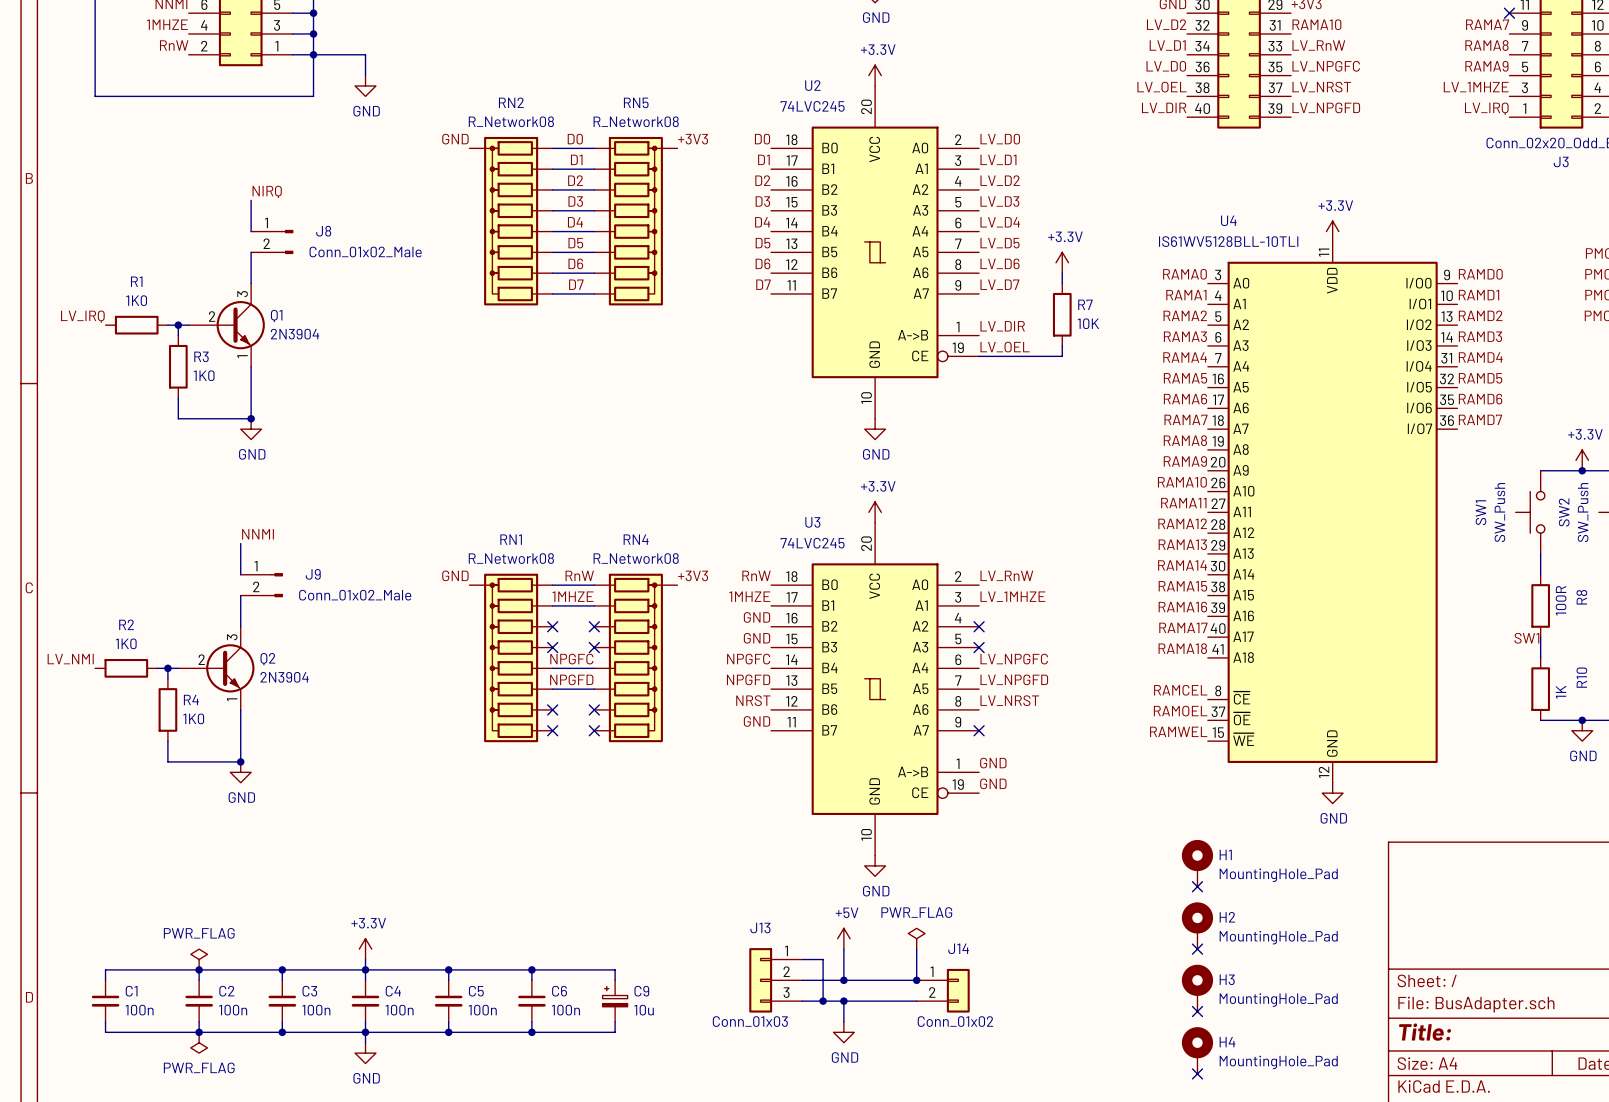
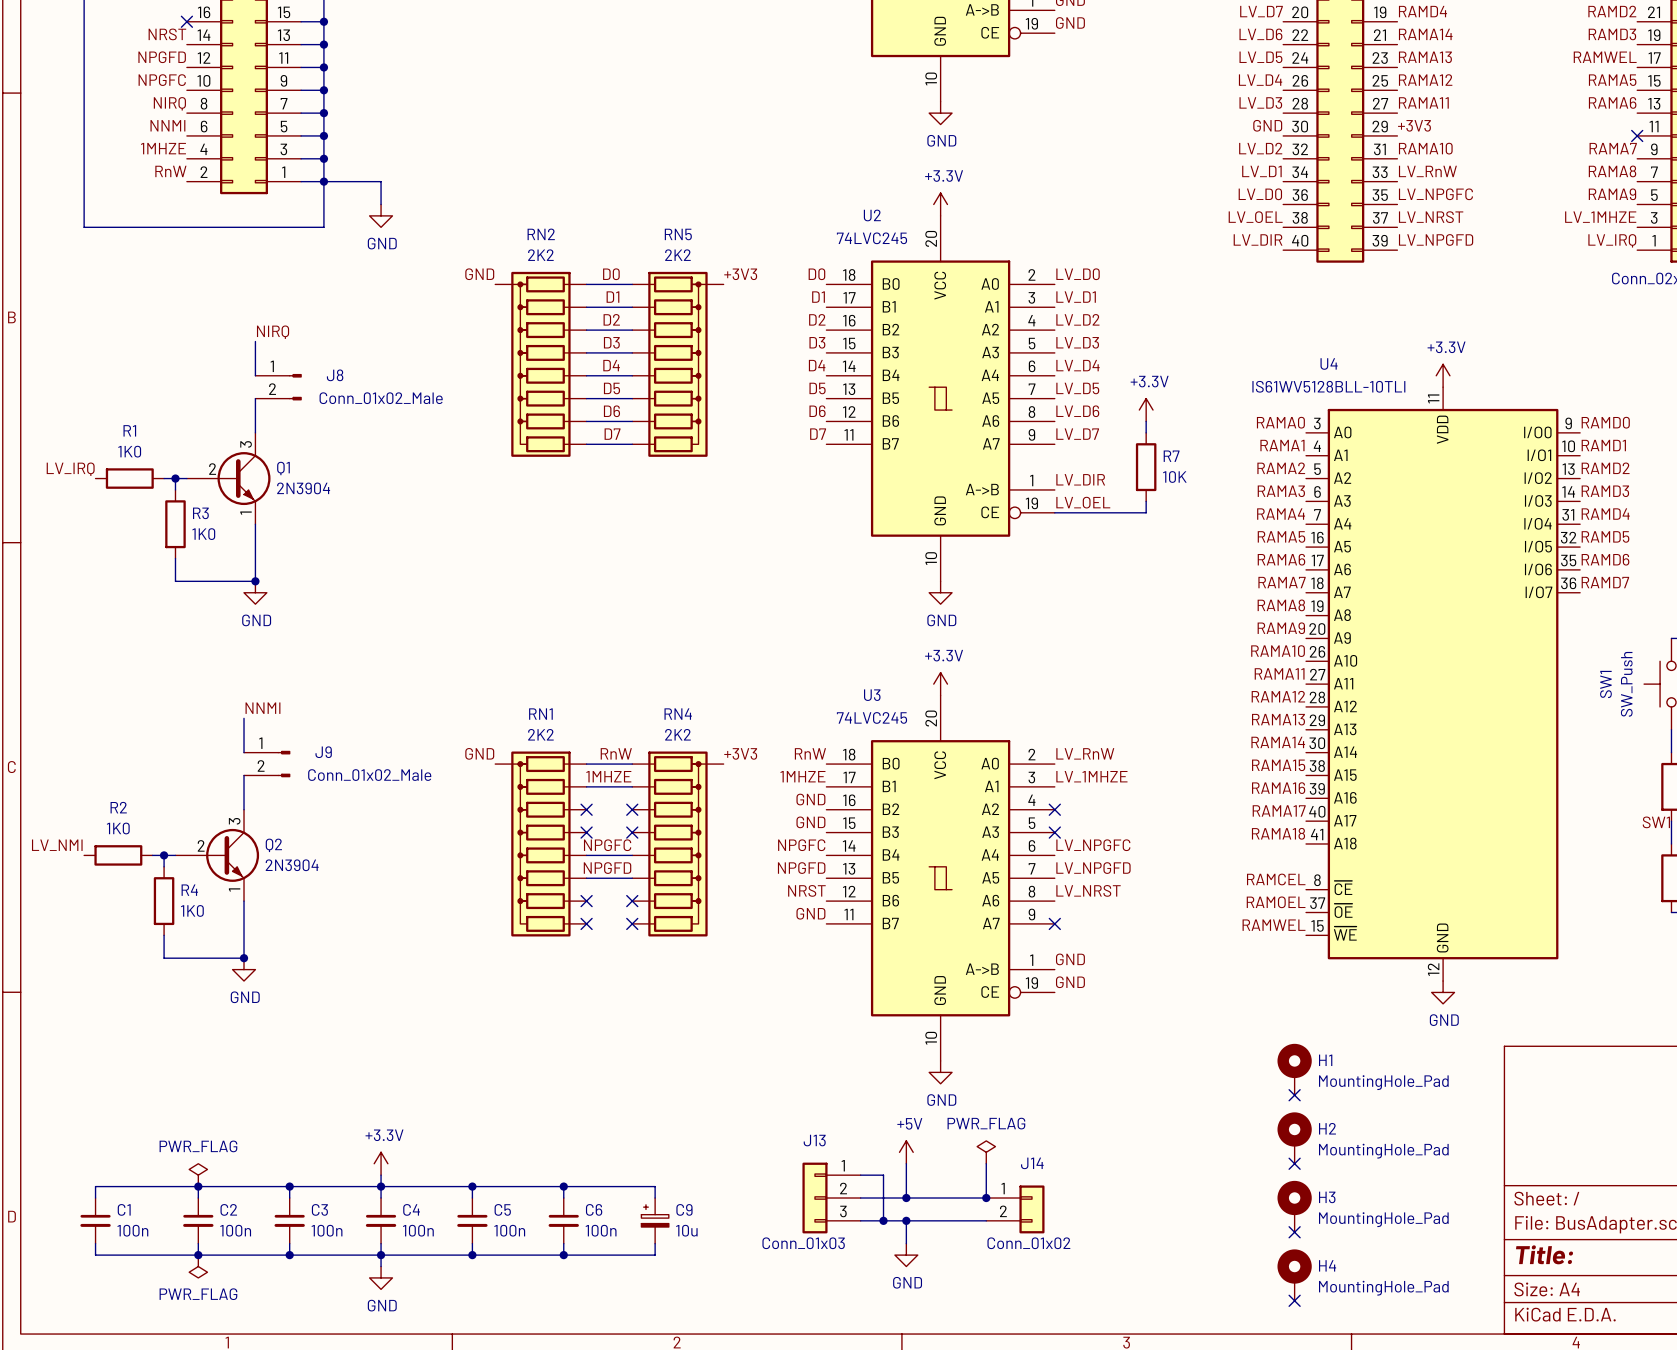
RN2 value: R_Network08 (511, 121) -> 2K2 (540, 255)
RN5 value: R_Network08 (636, 121) -> 2K2 (677, 255)
RN1 value: R_Network08 (511, 558) -> 2K2 (540, 734)
RN4 value: R_Network08 (636, 558) -> 2K2 (677, 734)

